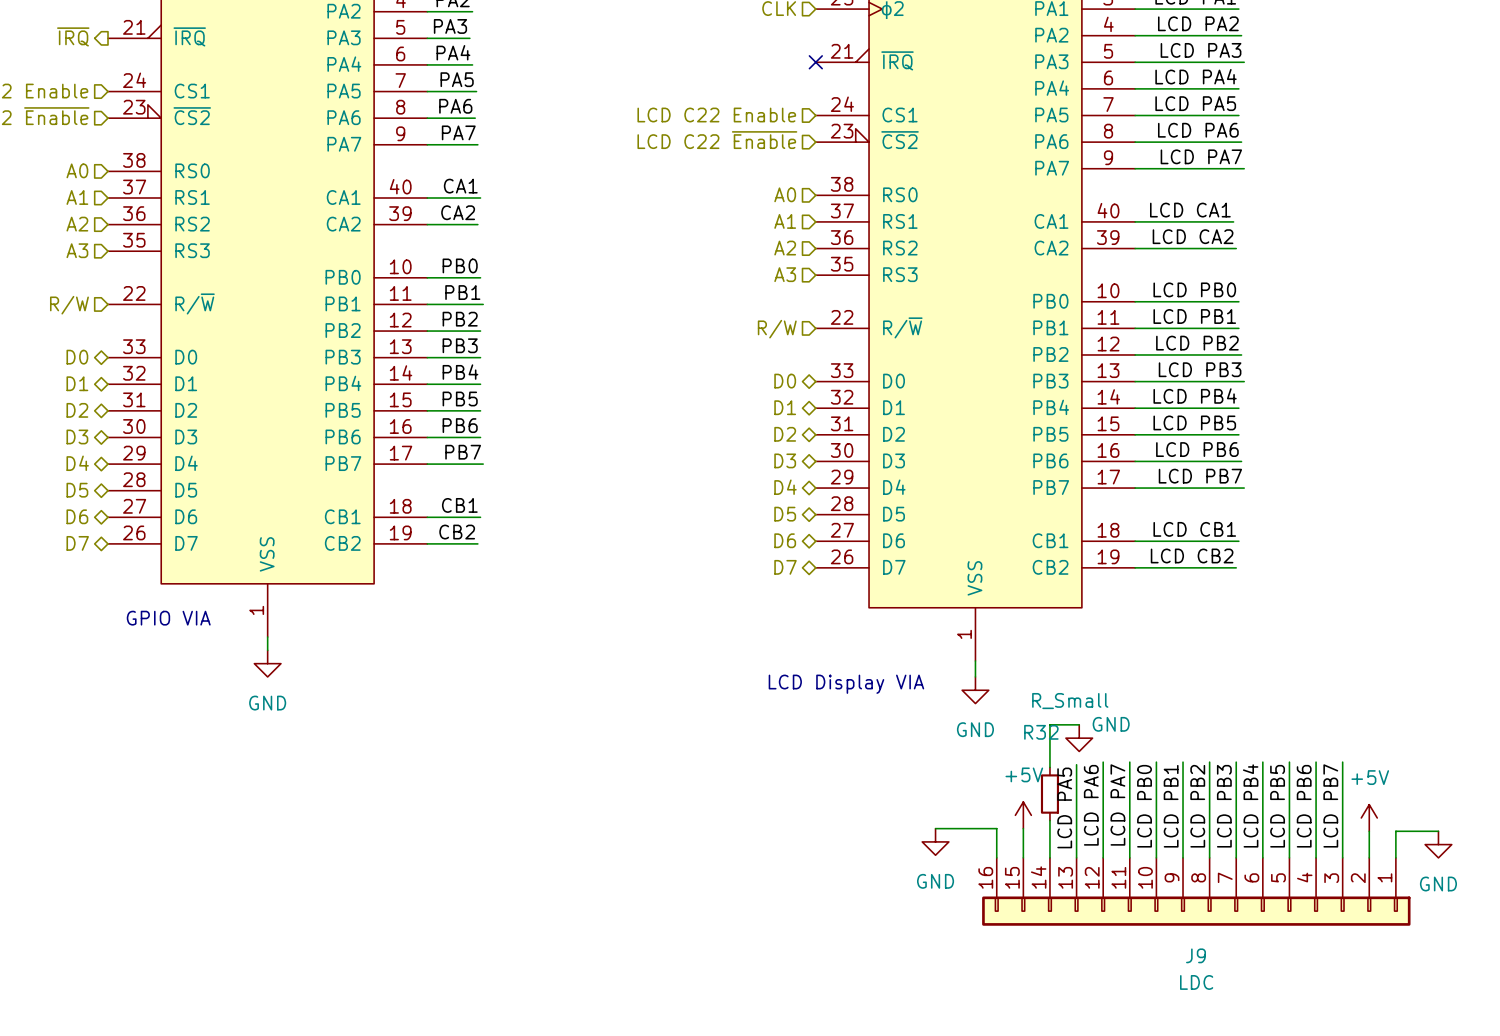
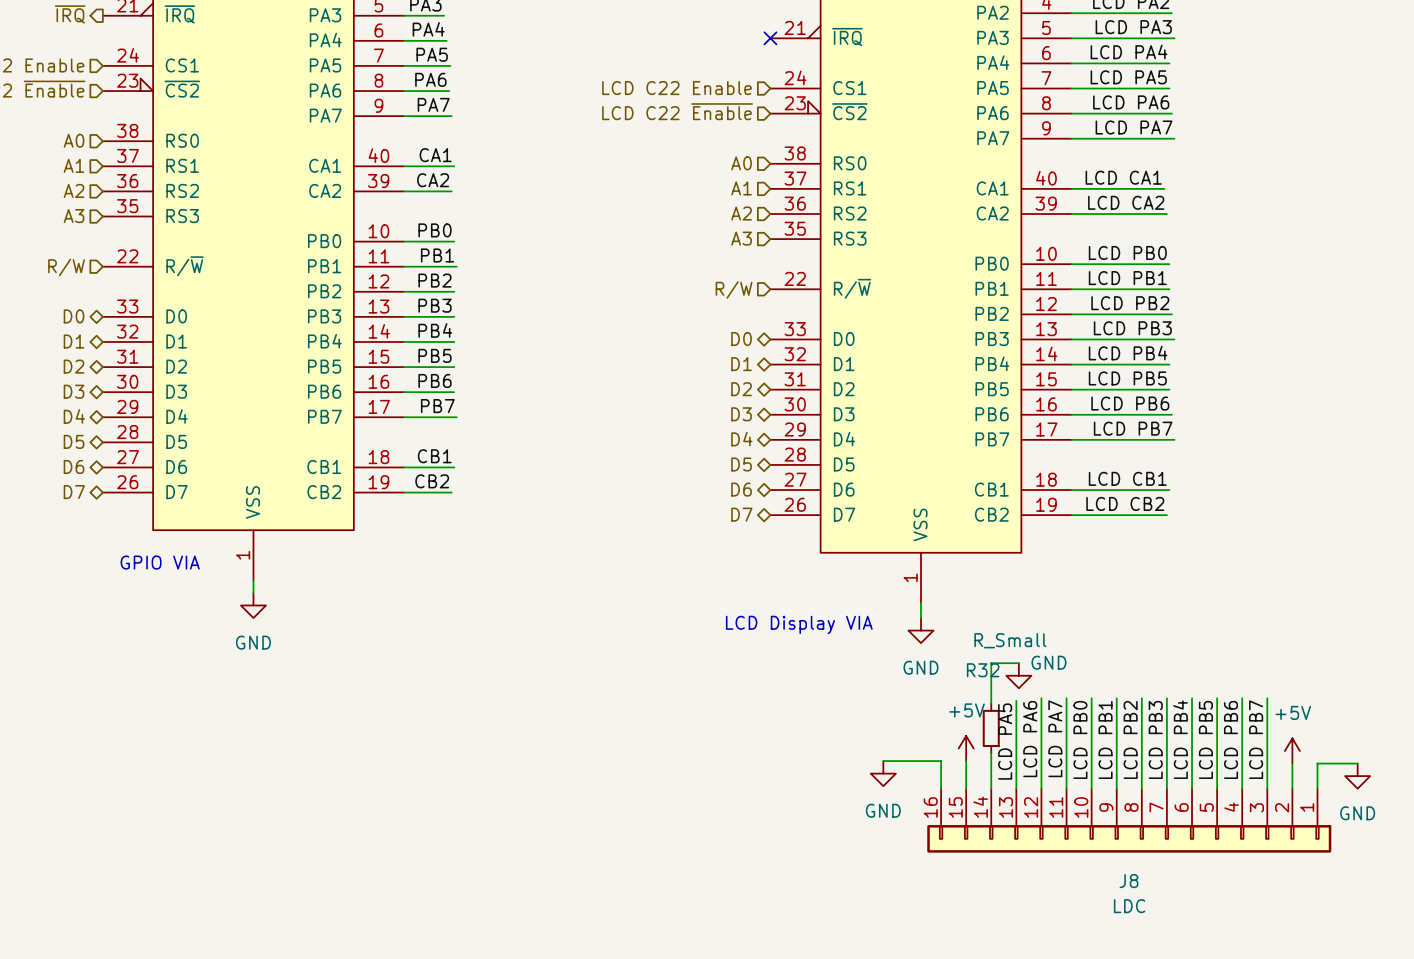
J9 name: J9 (1196, 955) -> J8 (1128, 881)

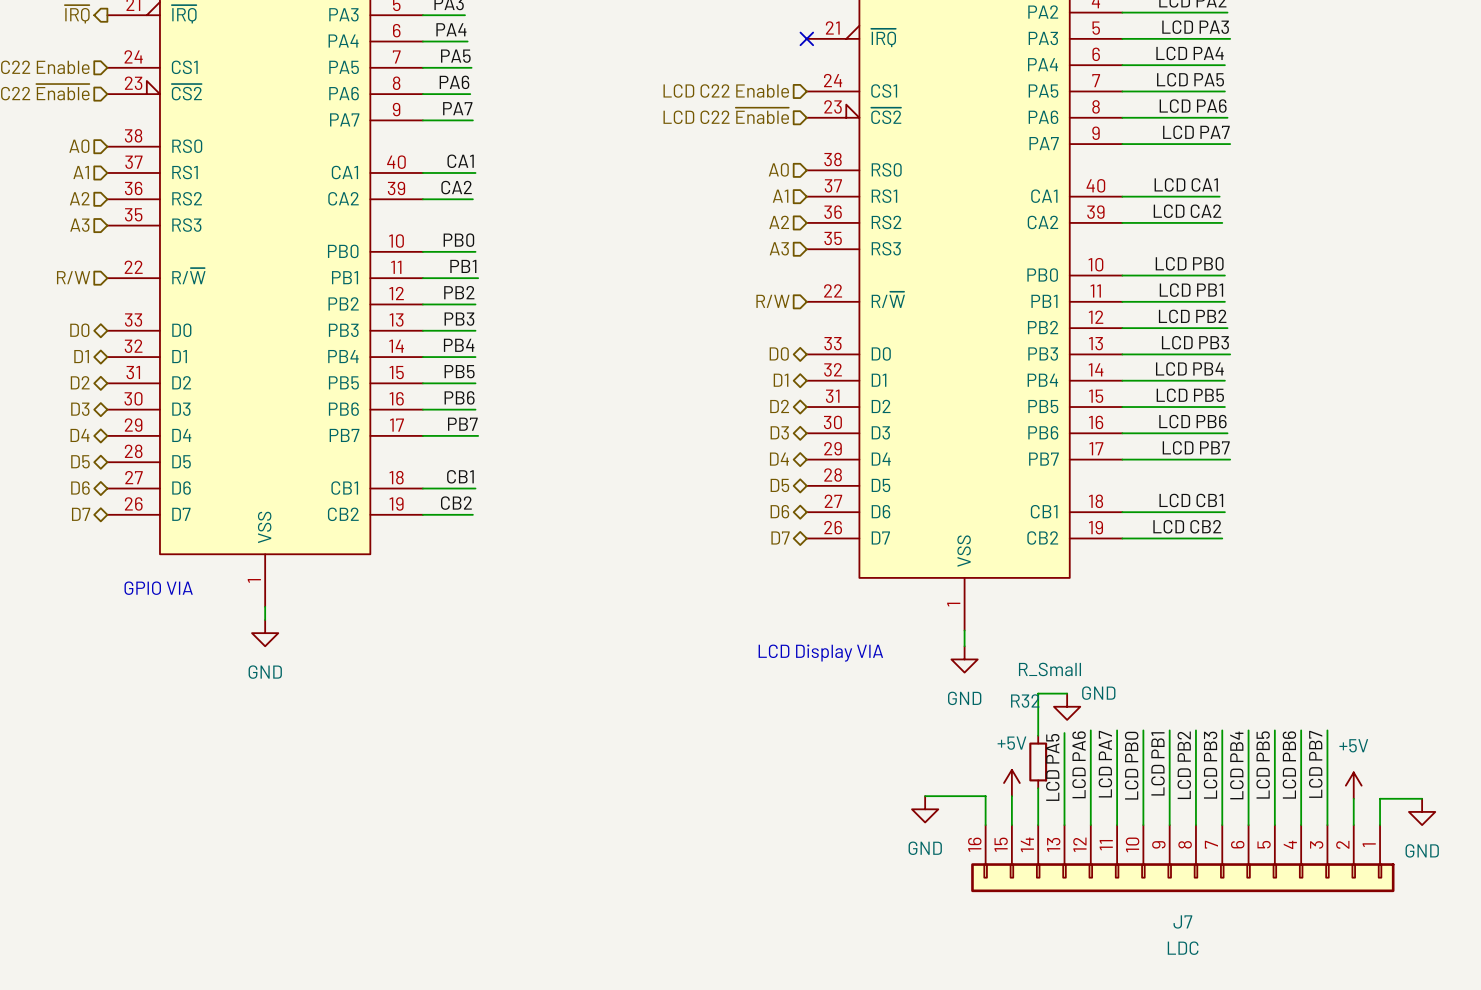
J8 name: J8 (1128, 881) -> J7 (1182, 921)

